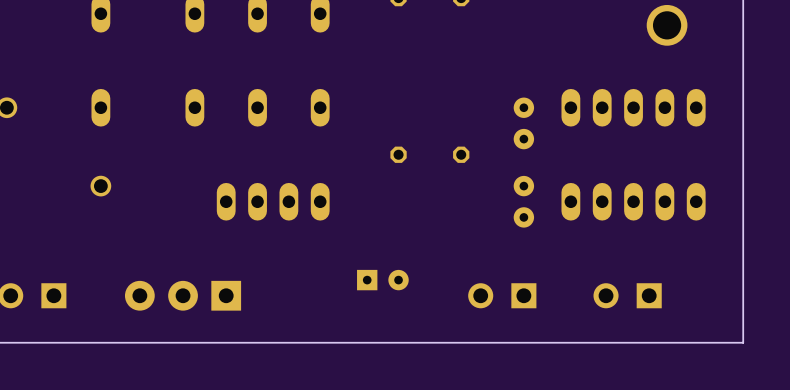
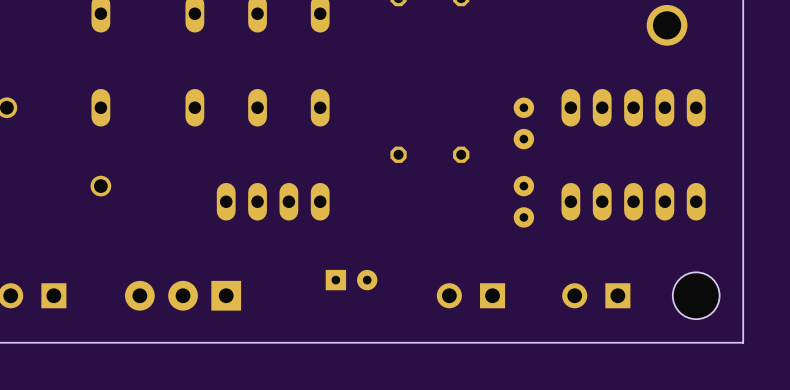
part position: (382, 280) -> (351, 280)
part position: (502, 295) -> (470, 295)
part position: (627, 295) -> (596, 295)
hole: none -> (696, 295)

